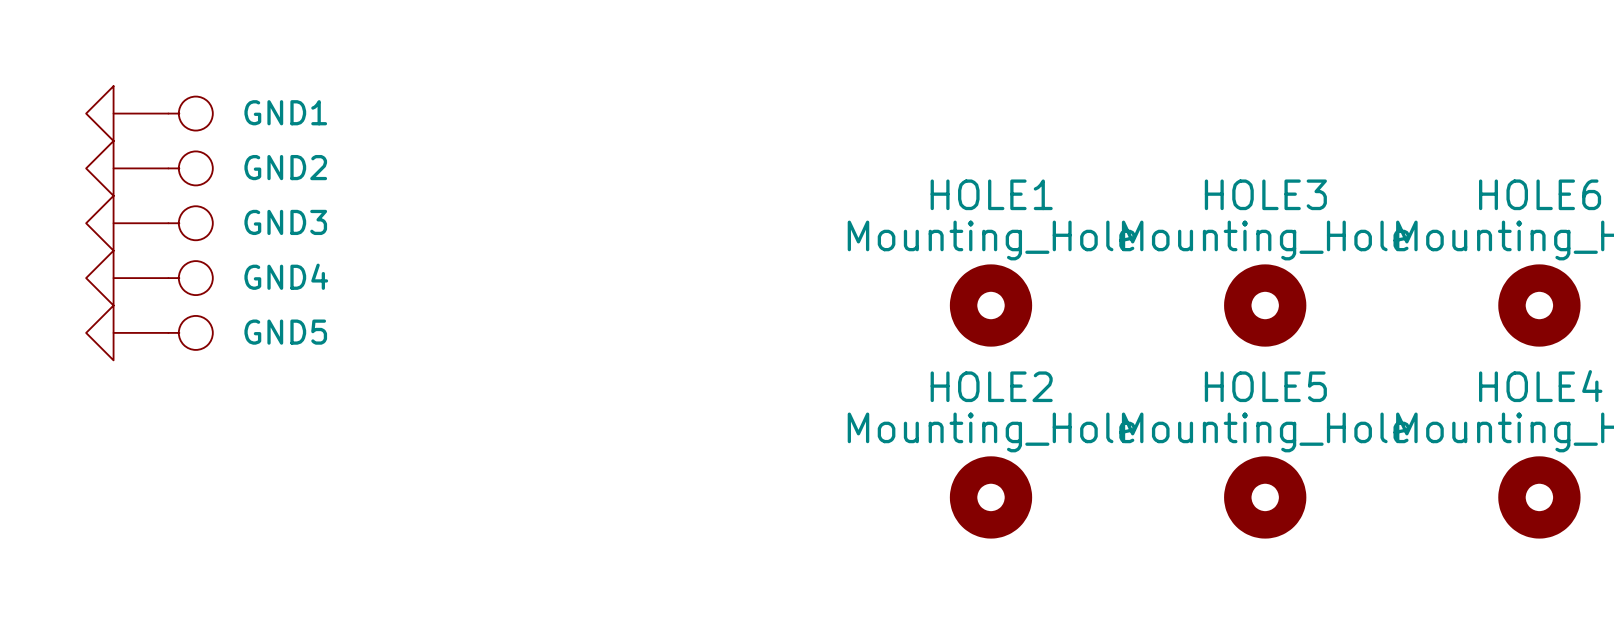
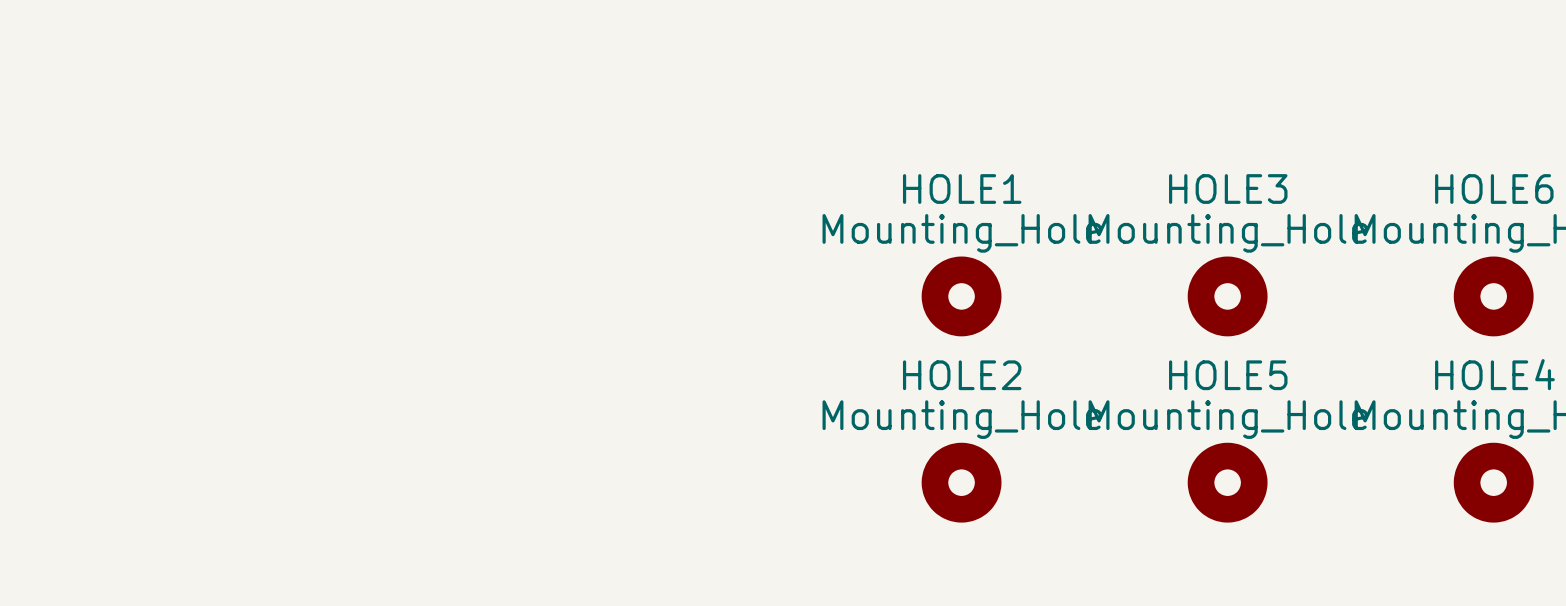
power symbol: (99, 113) -> none
GND1: (163, 113) -> none
power symbol: (99, 168) -> none
GND2: (163, 168) -> none
power symbol: (99, 223) -> none
GND3: (163, 223) -> none
power symbol: (99, 278) -> none
GND4: (163, 278) -> none
power symbol: (99, 332) -> none
GND5: (163, 332) -> none

